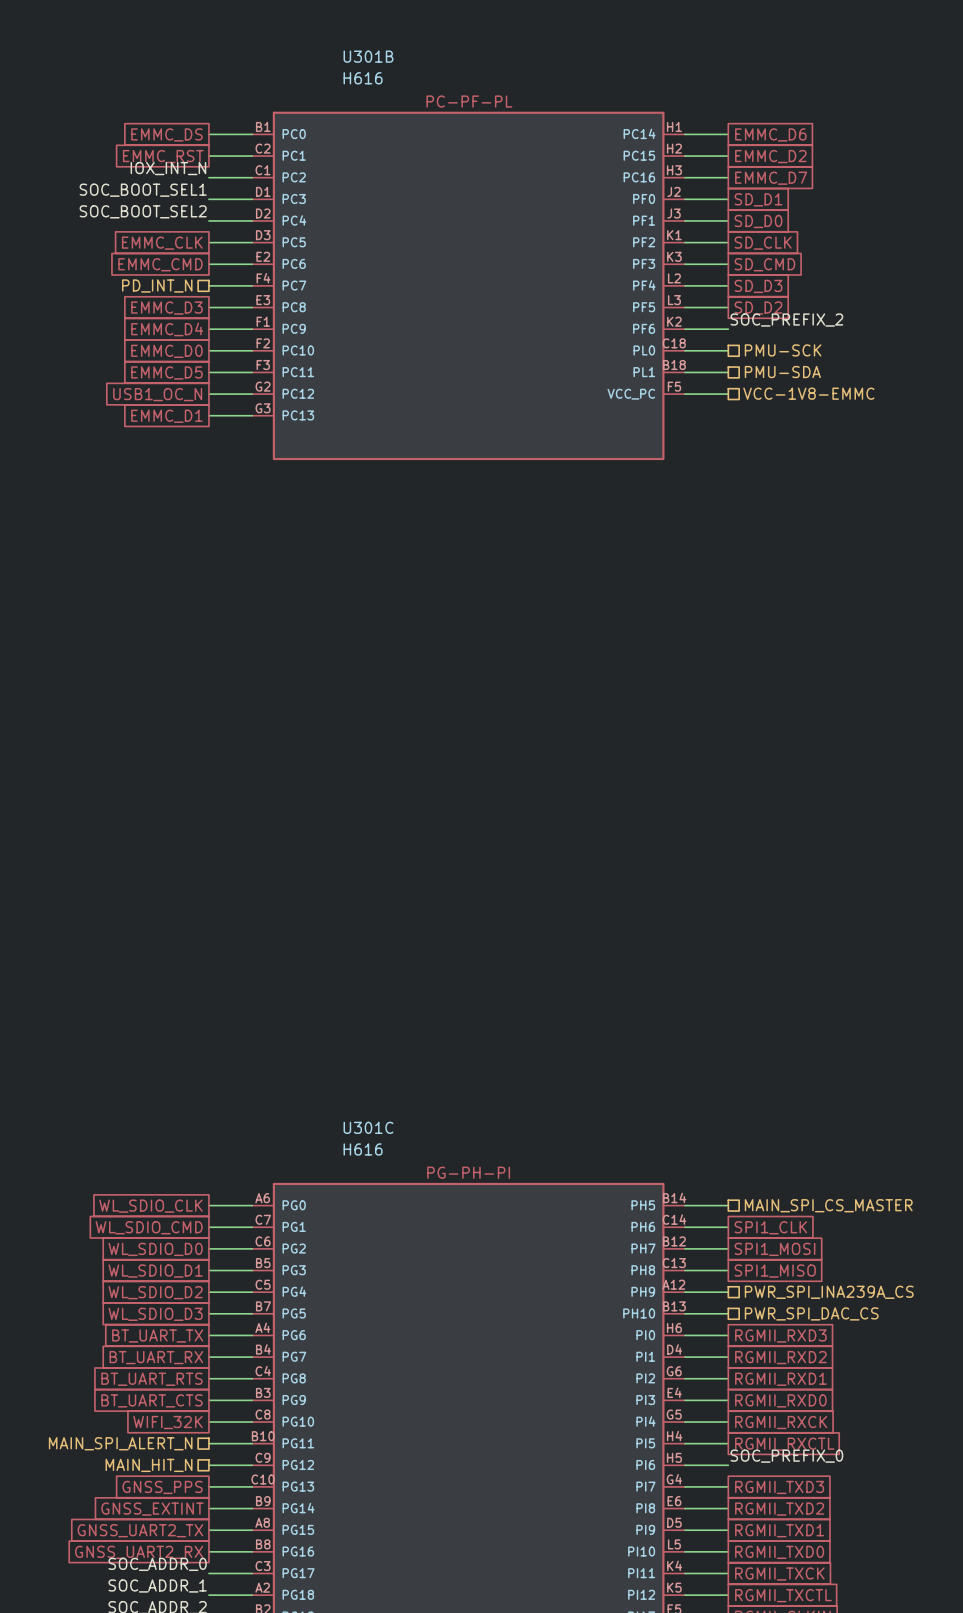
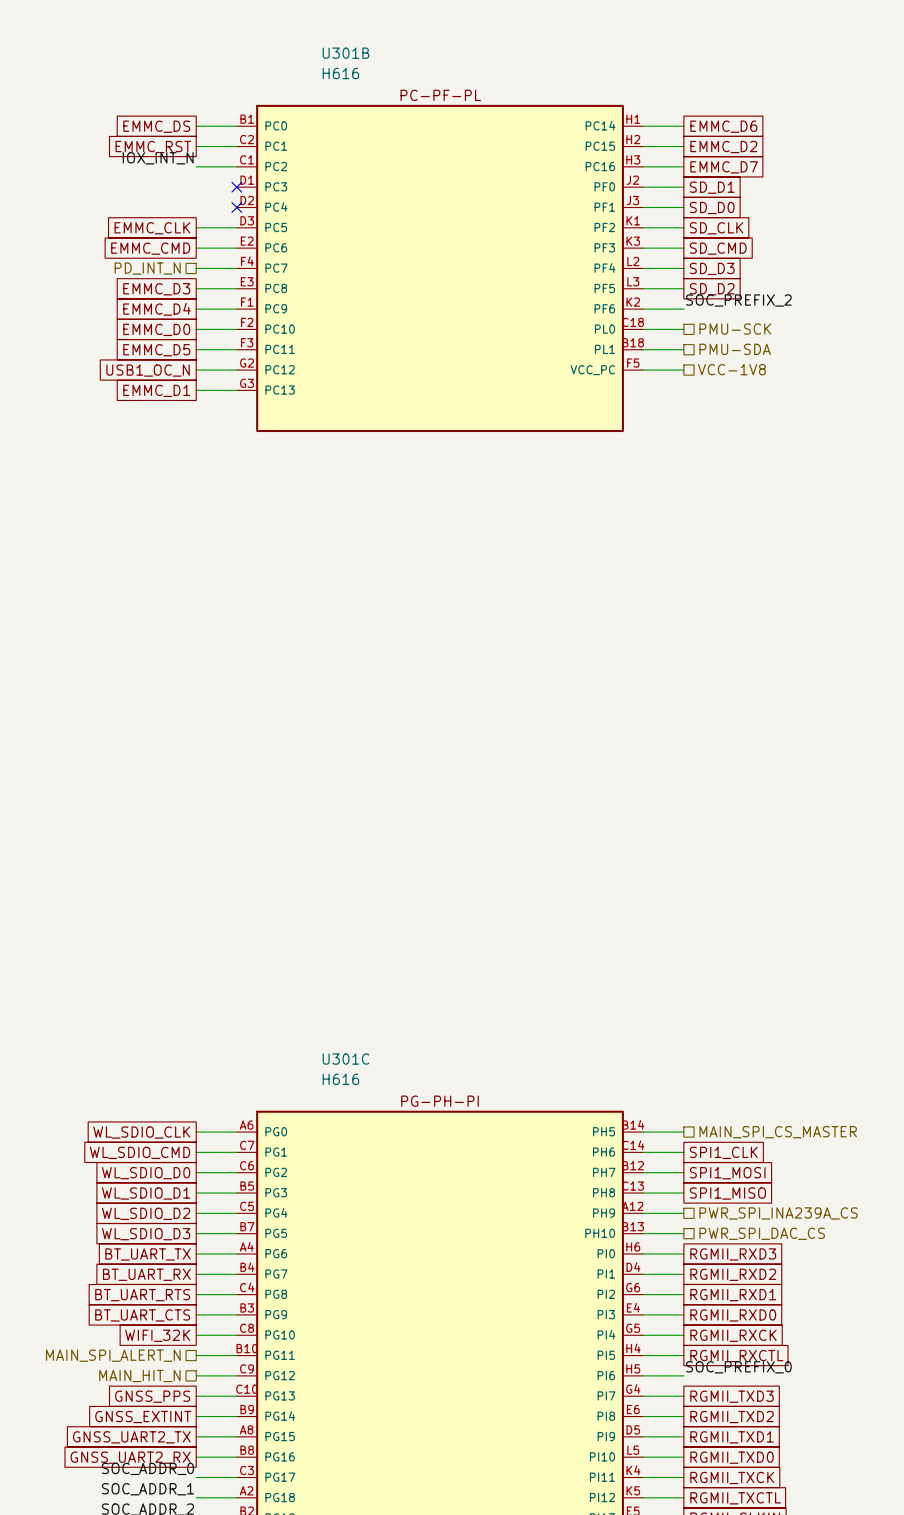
label: SOC_BOOT_SEL1 (143, 190) -> none
wire: (208, 199) (252, 199) -> none
no-connect mark: none -> (236, 187)
label: SOC_BOOT_SEL2 (143, 211) -> none
wire: (208, 220) (252, 220) -> none
no-connect mark: none -> (236, 207)
hierarchical label: VCC-1V8-EMMC (808, 393) -> VCC-1V8 (731, 369)

